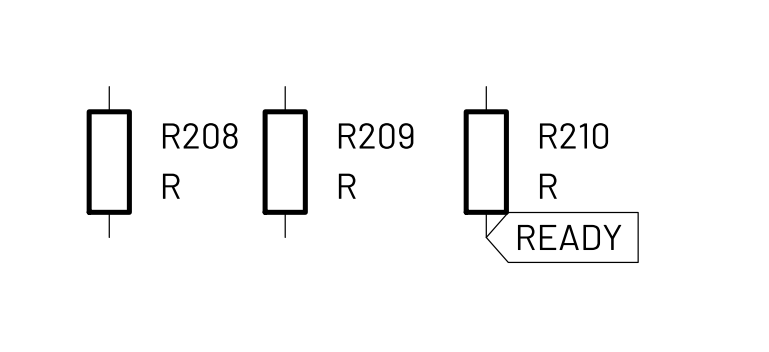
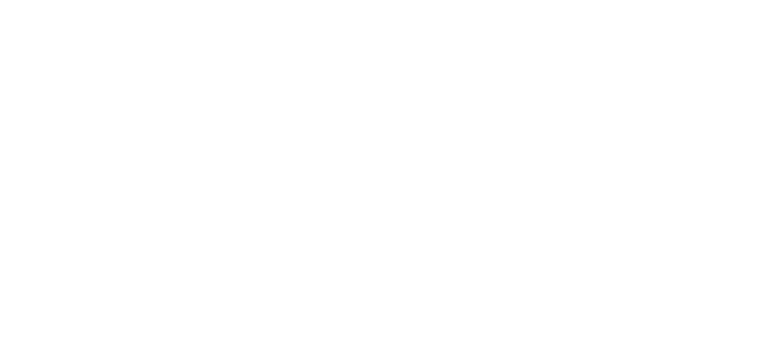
R208: R (109, 162) -> none
R209: R (285, 162) -> none
R210: R (486, 162) -> none
global label: READY (569, 237) -> none

